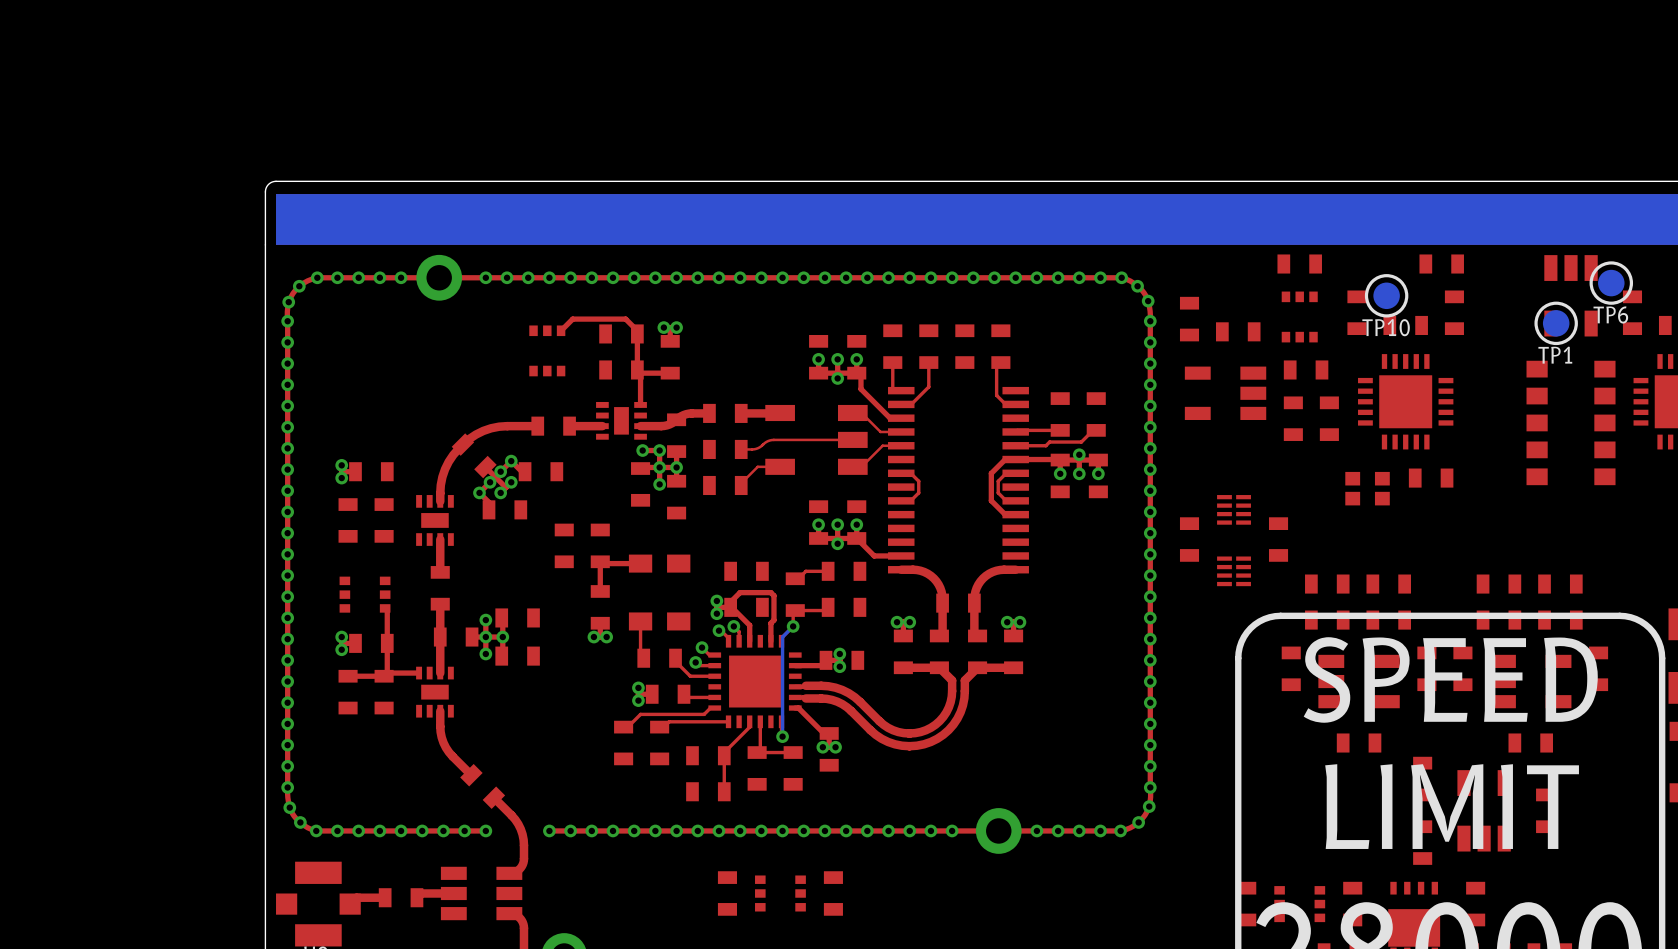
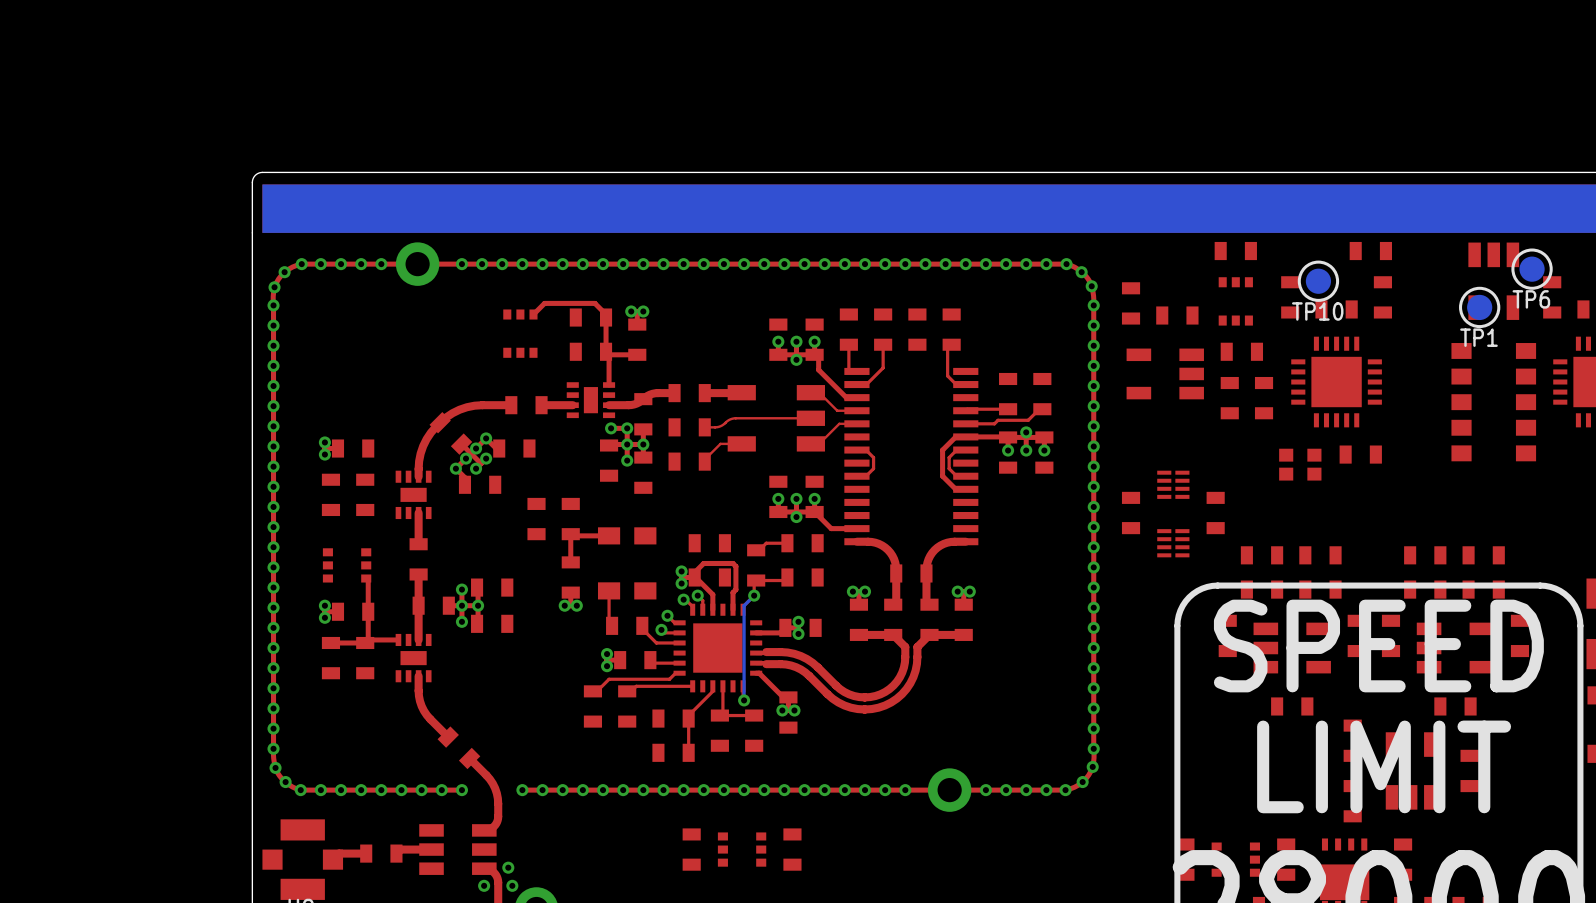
via: none -> (508, 867)
via: none -> (484, 885)
via: none -> (512, 885)

